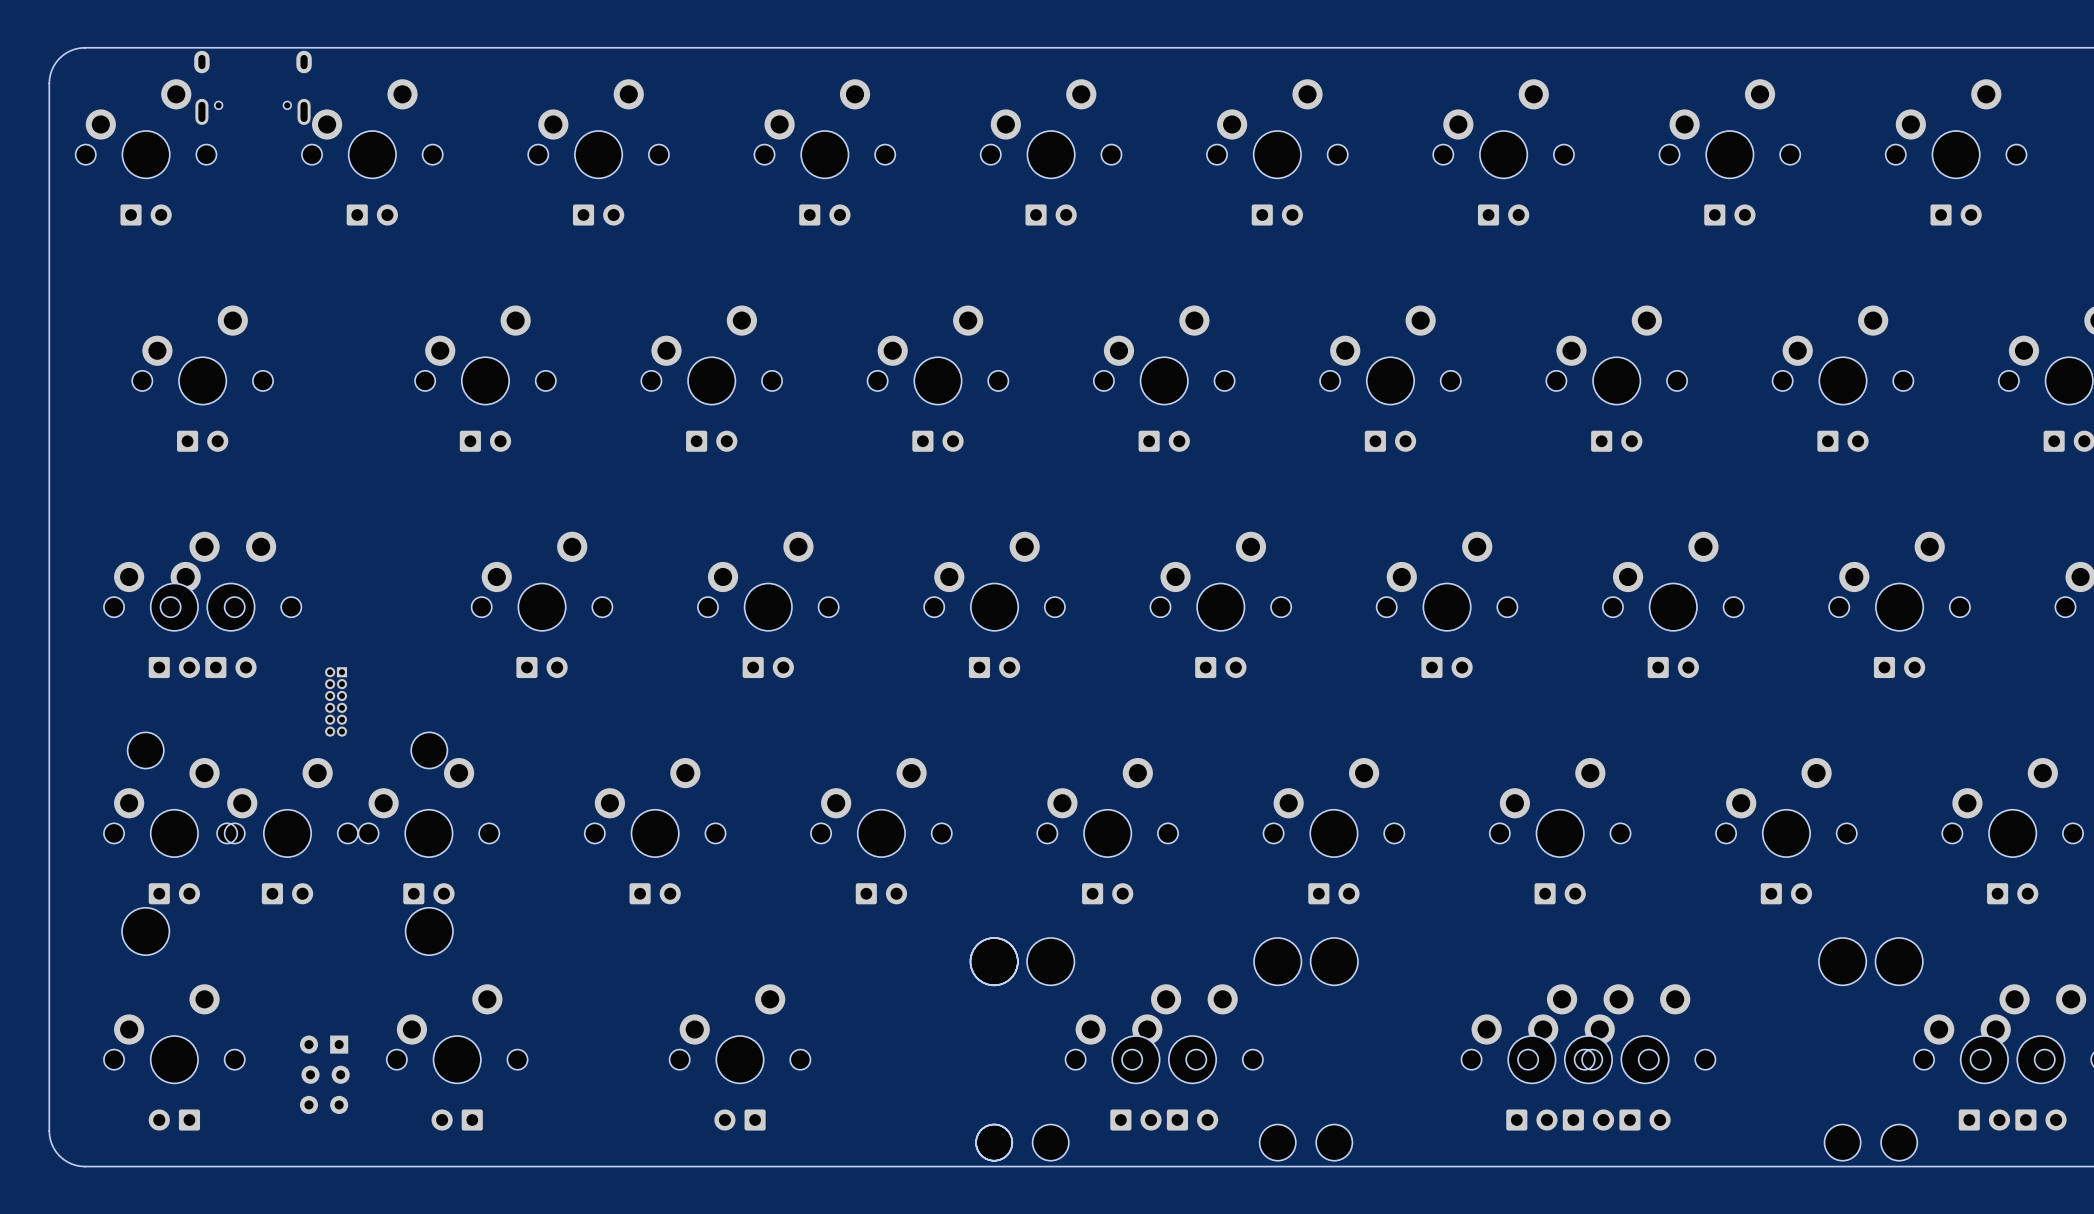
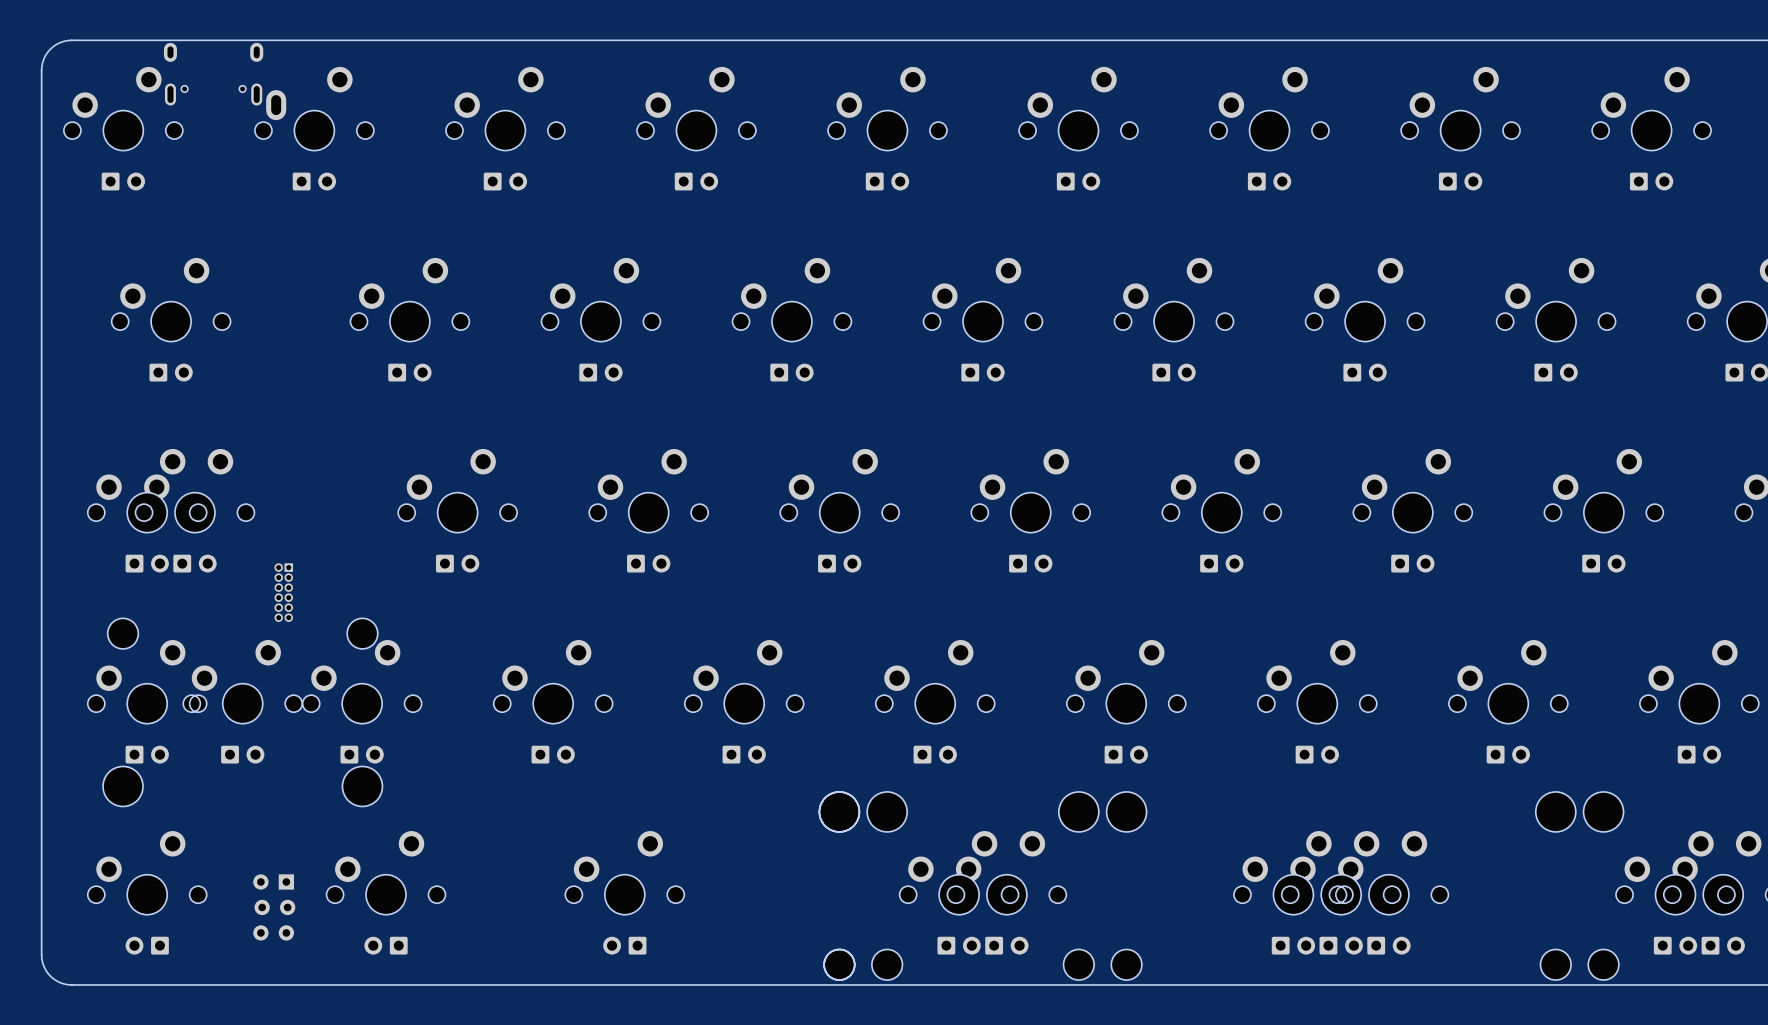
part footprint: [301, 79, 443, 179] -> [254, 66, 374, 151]

